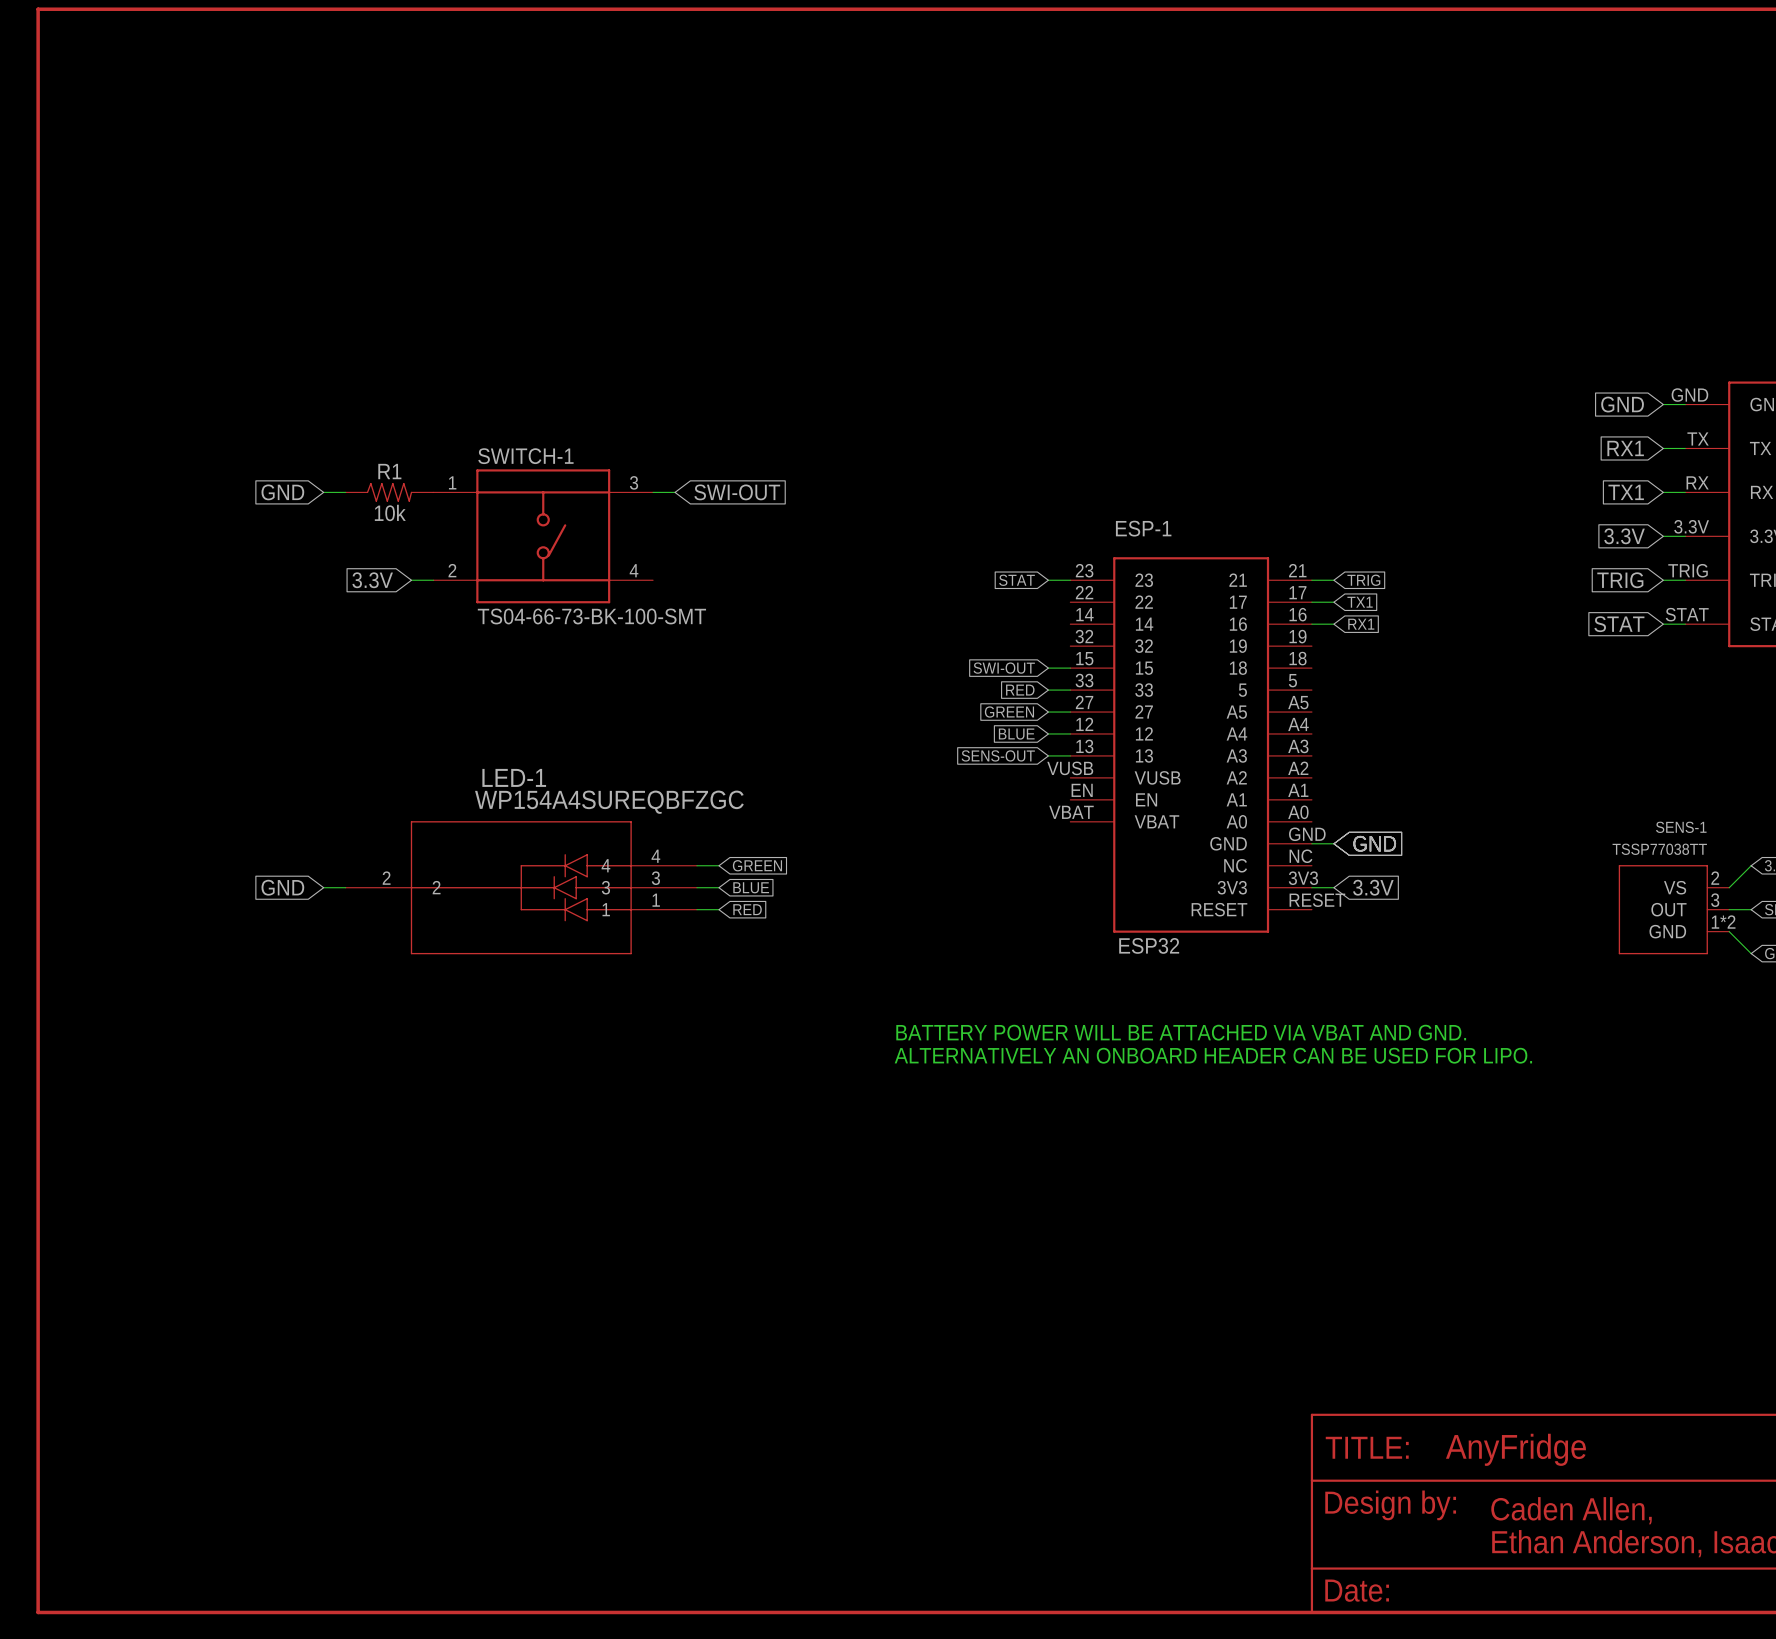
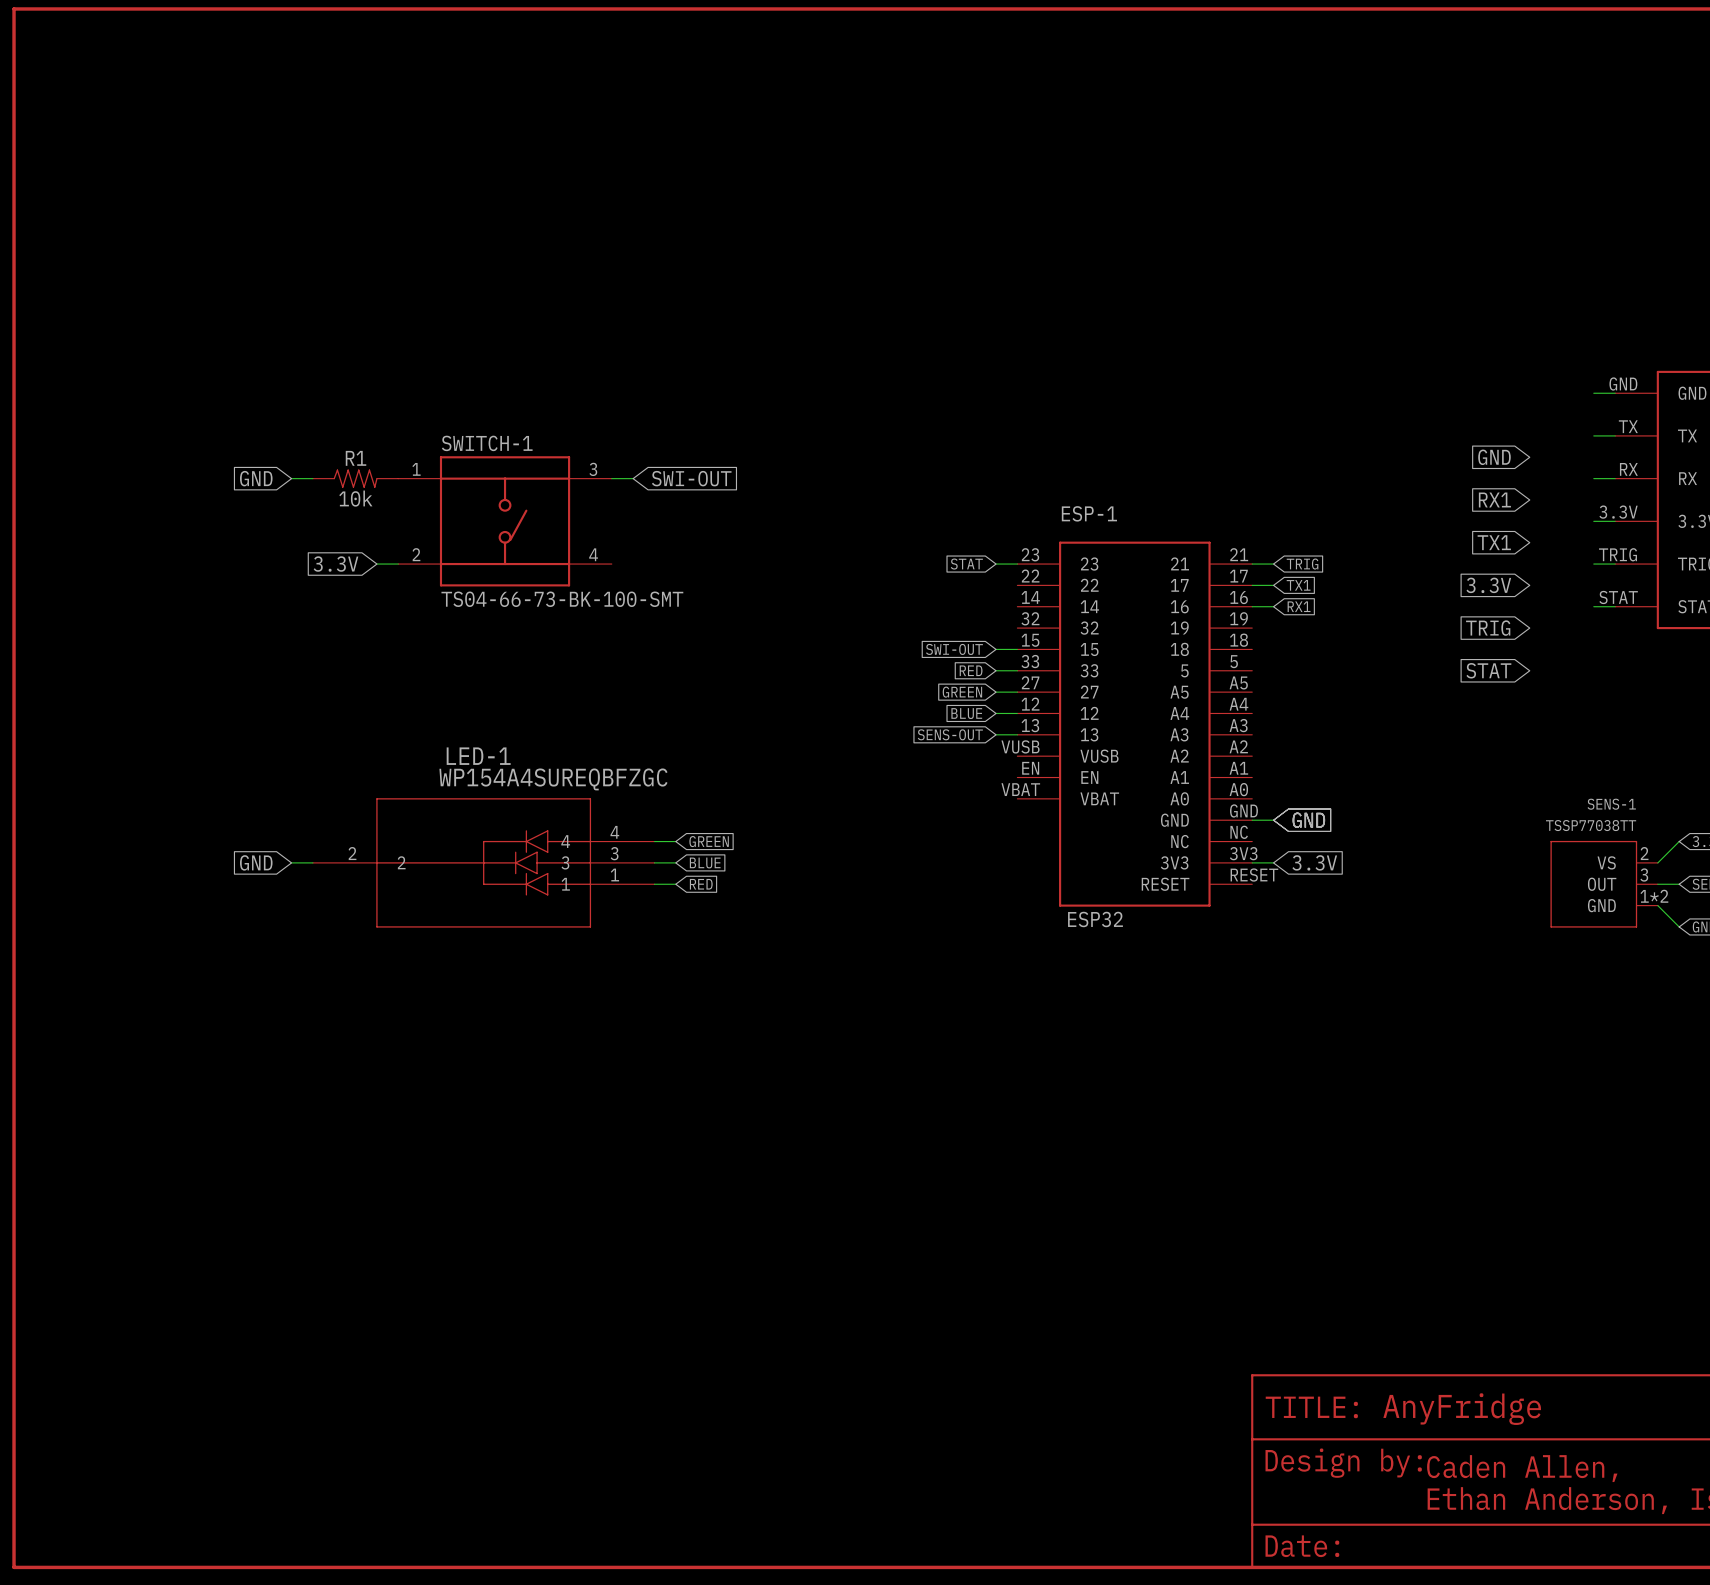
global label position: GND (1622, 404) -> GND (1494, 457)
global label position: RX1 (1625, 448) -> RX1 (1494, 499)
global label position: TX1 (1626, 492) -> TX1 (1494, 542)
global label position: 3.3V (1624, 536) -> 3.3V (1488, 585)
global label position: TRIG (1620, 580) -> TRIG (1488, 628)
global label position: STAT (1619, 624) -> STAT (1488, 670)
text: BATTERY POWER WILL BE ATTACHED VIA VBAT AND GND. (1181, 1032) -> none
text: ALTERNATIVELY AN ONBOARD HEADER CAN BE USED FOR LIPO. (1213, 1055) -> none

